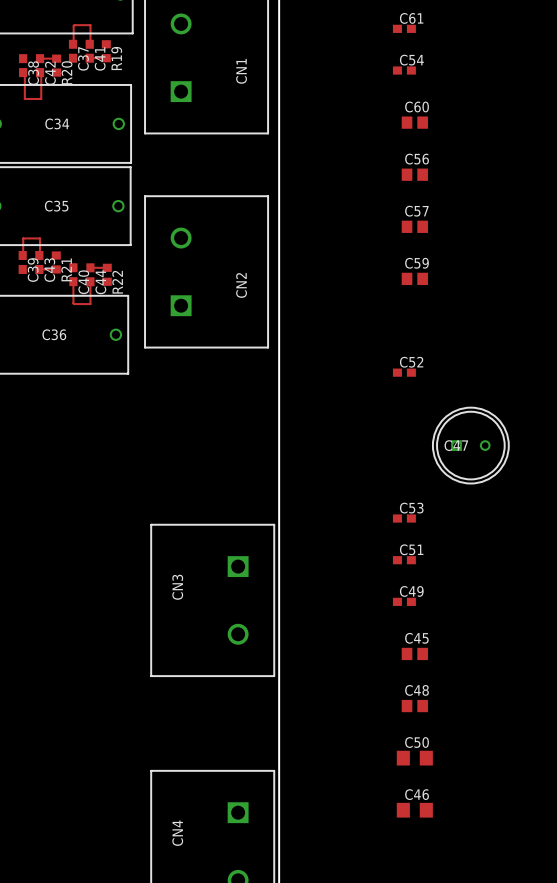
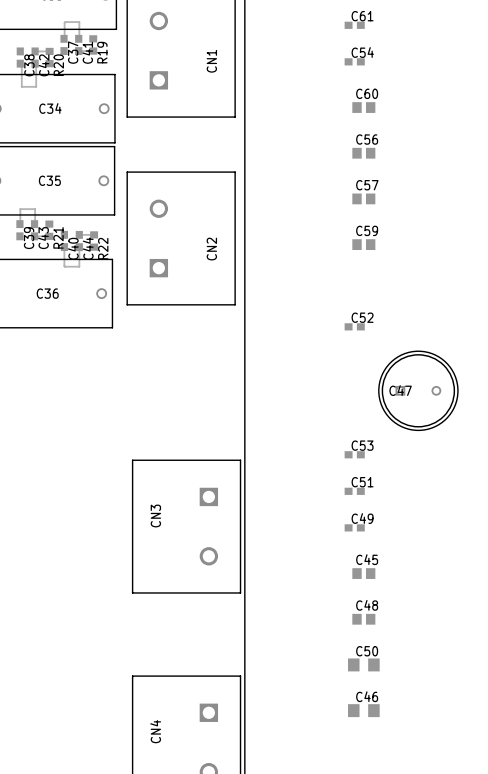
C47 footprint: [432, 407, 510, 484] -> [378, 351, 459, 431]

